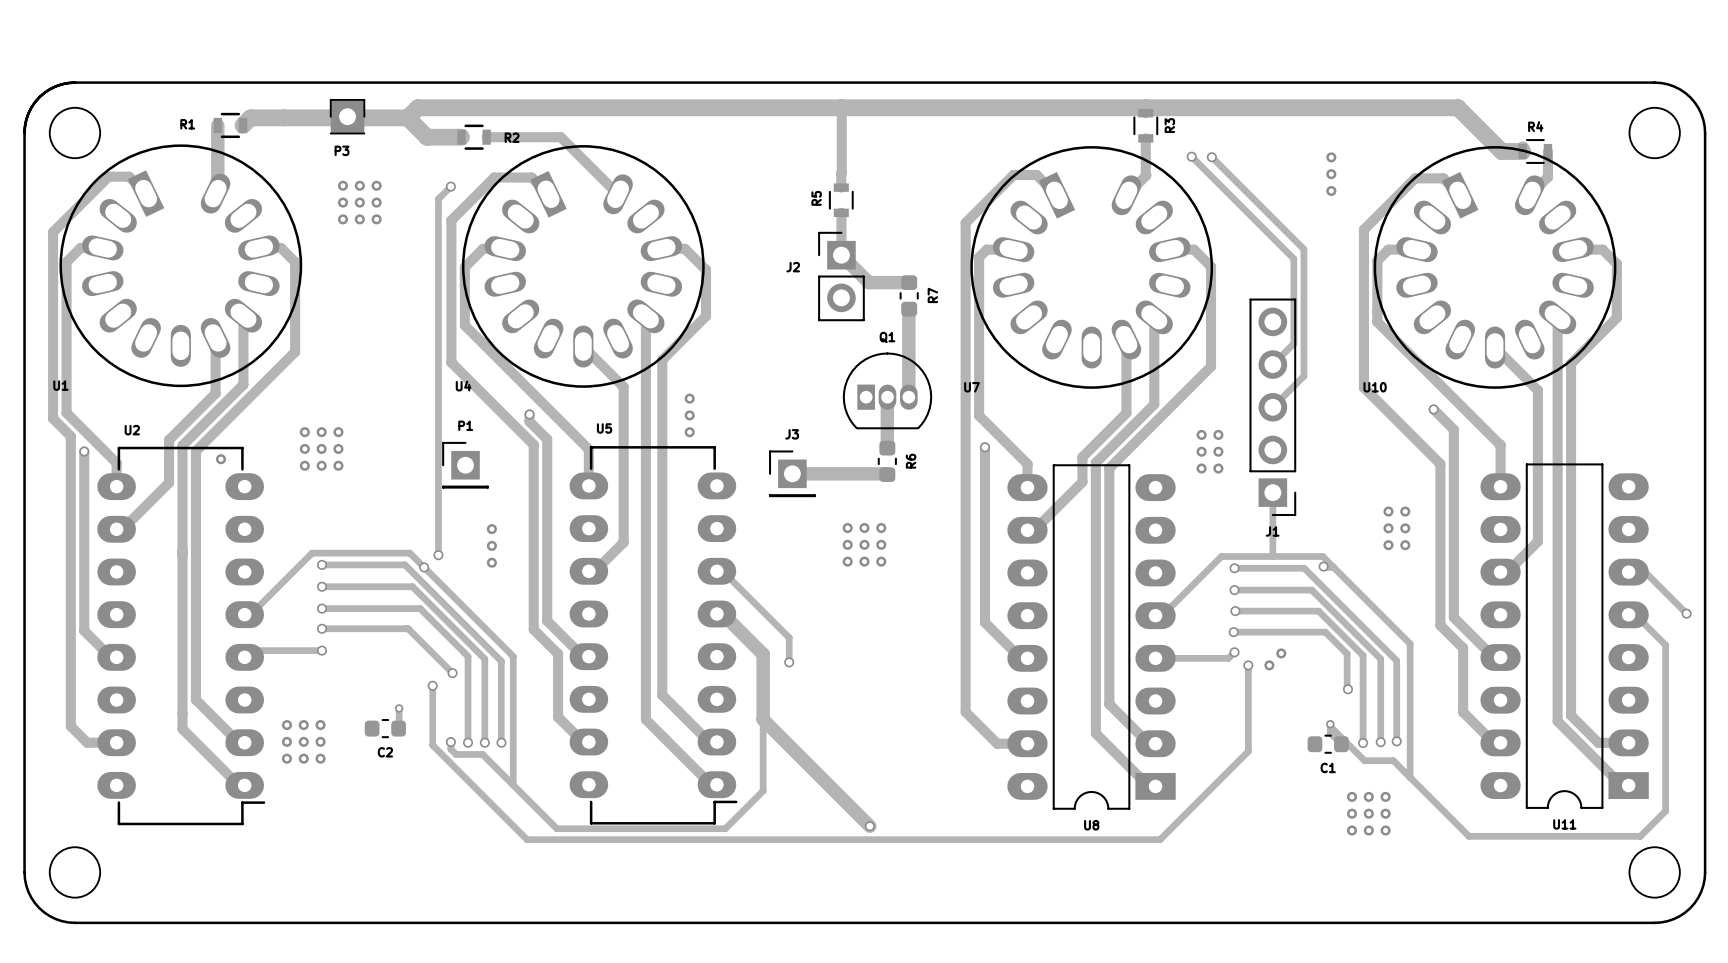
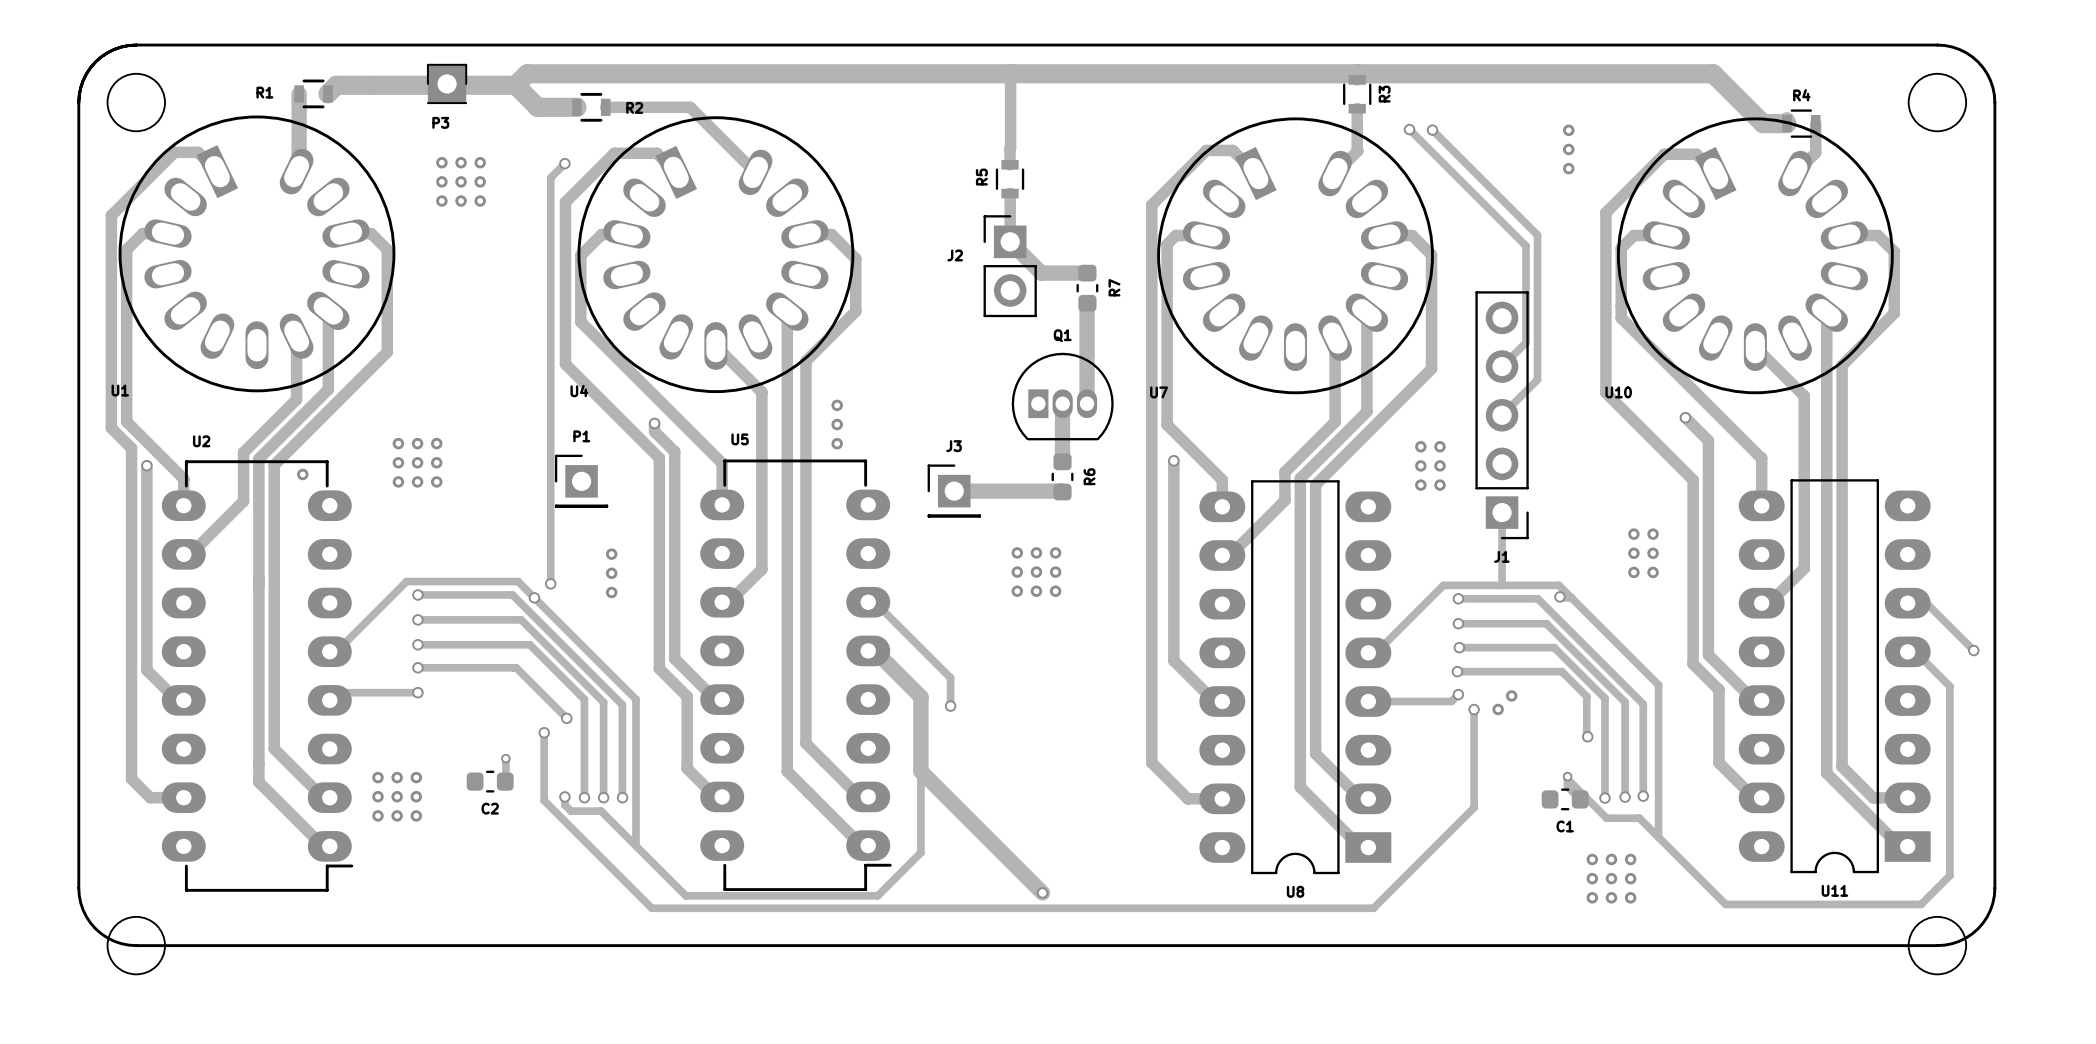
board edge: (24, 822) (24, 879) (31, 897) (39, 908) (49, 916) (61, 921) (74, 922) (1654, 922) (1667, 921) (1679, 916) (1690, 908) (1698, 897) (1704, 879) (1705, 822) -> (78, 888) (83, 910) (95, 928) (114, 941) (136, 945) (1937, 945) (1959, 941) (1978, 928) (1990, 910) (1994, 888)

